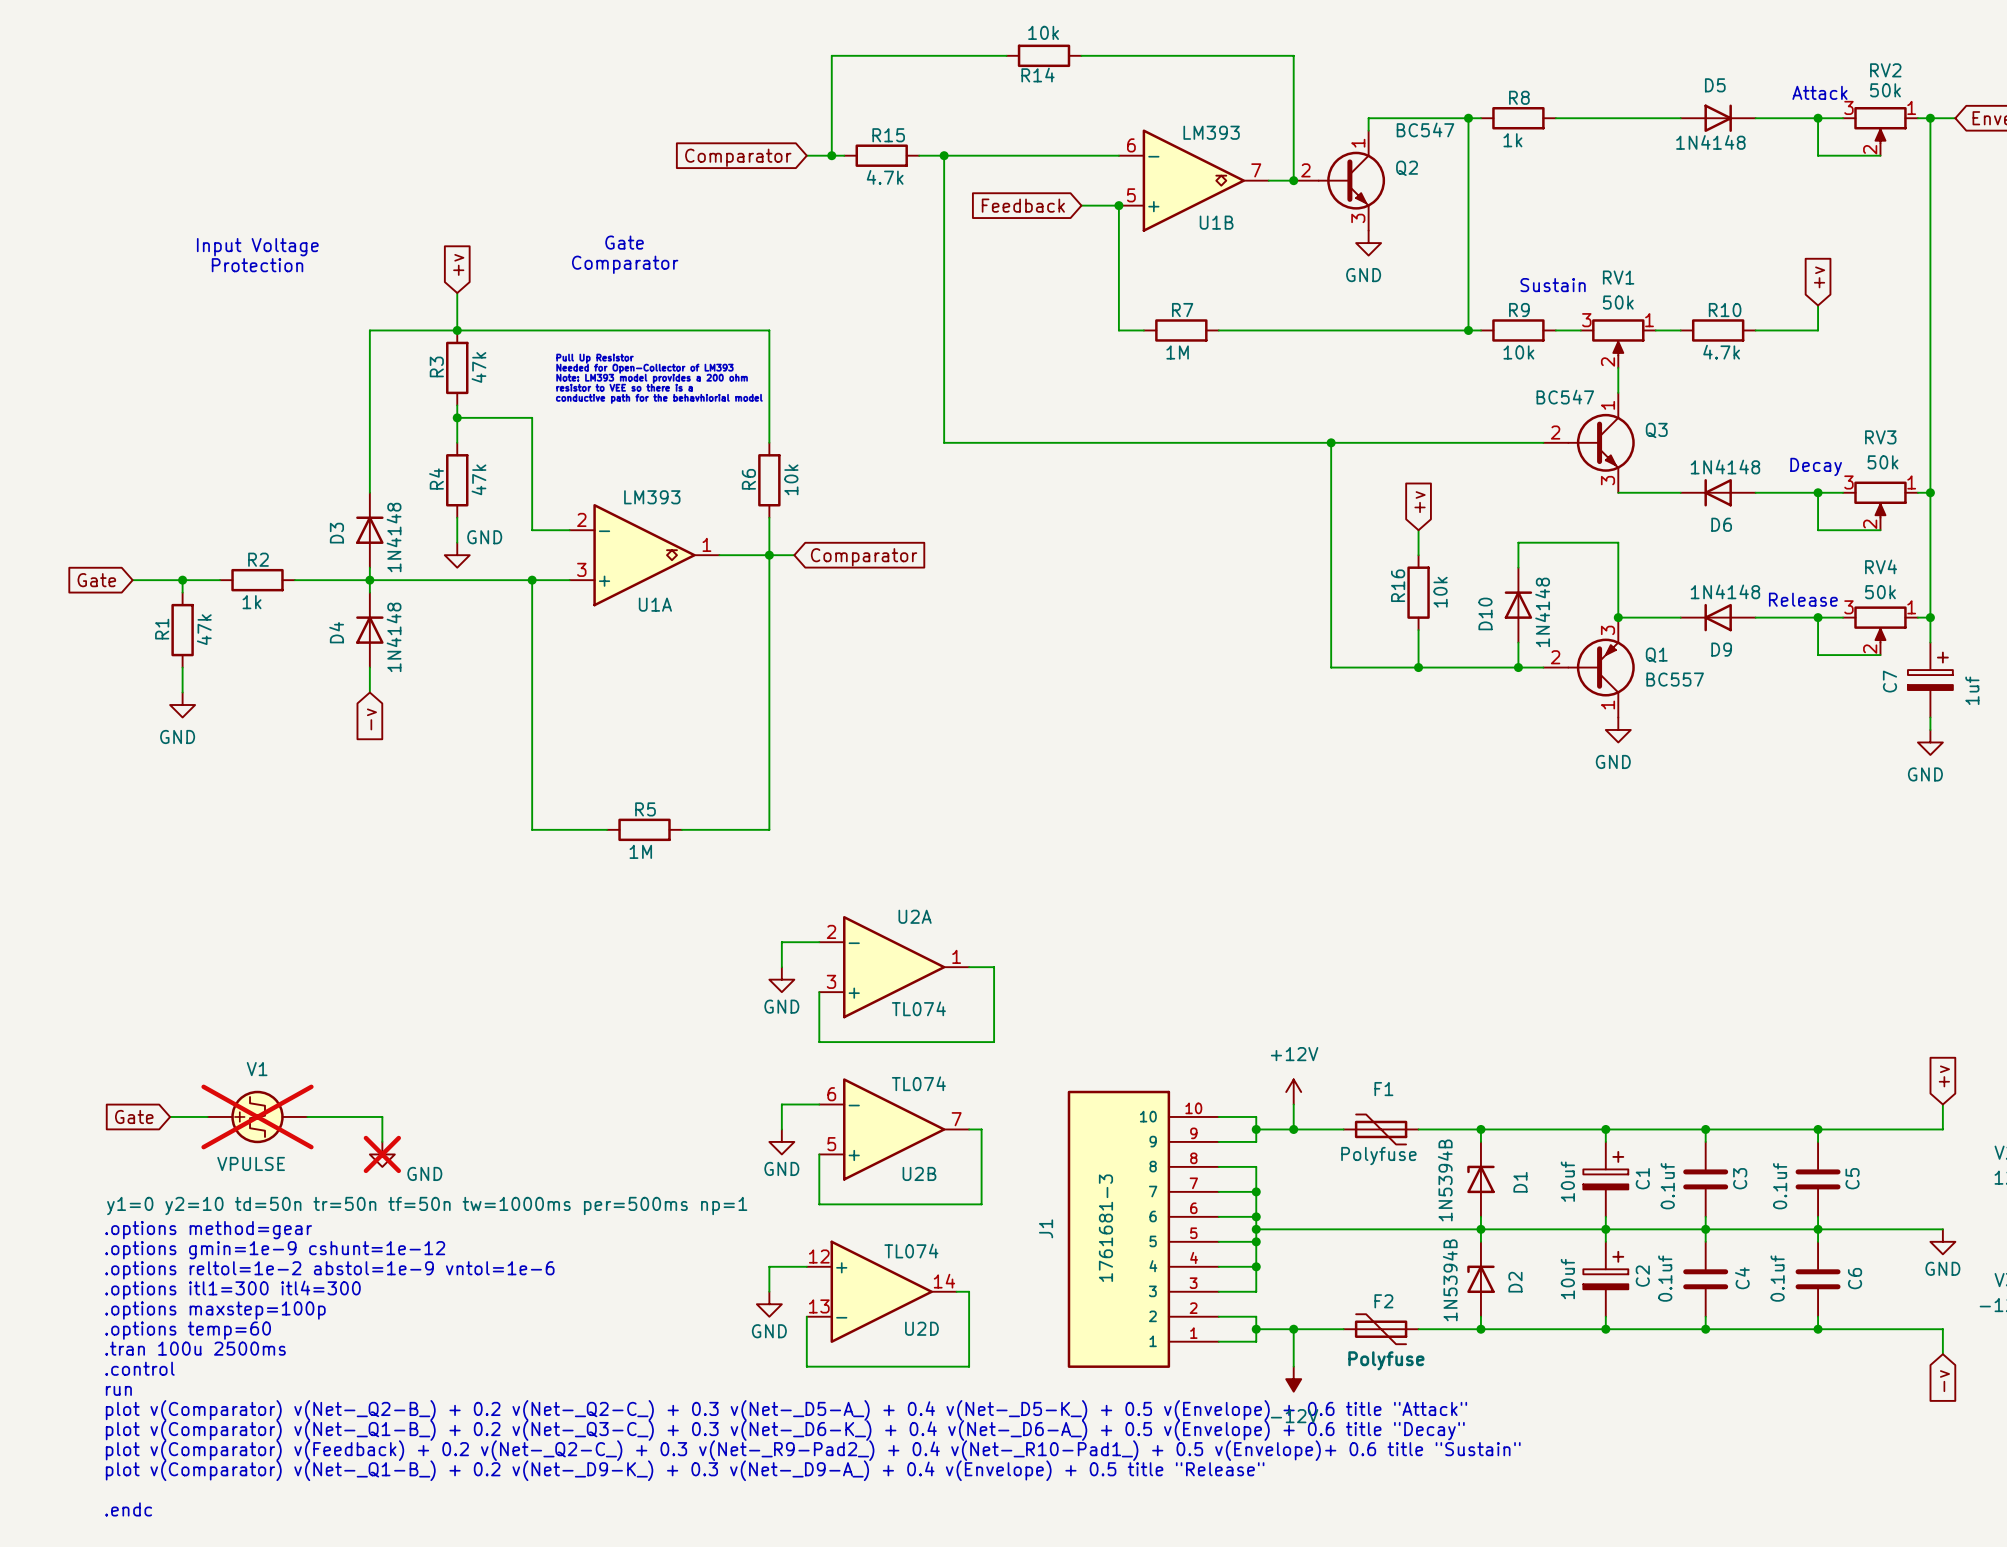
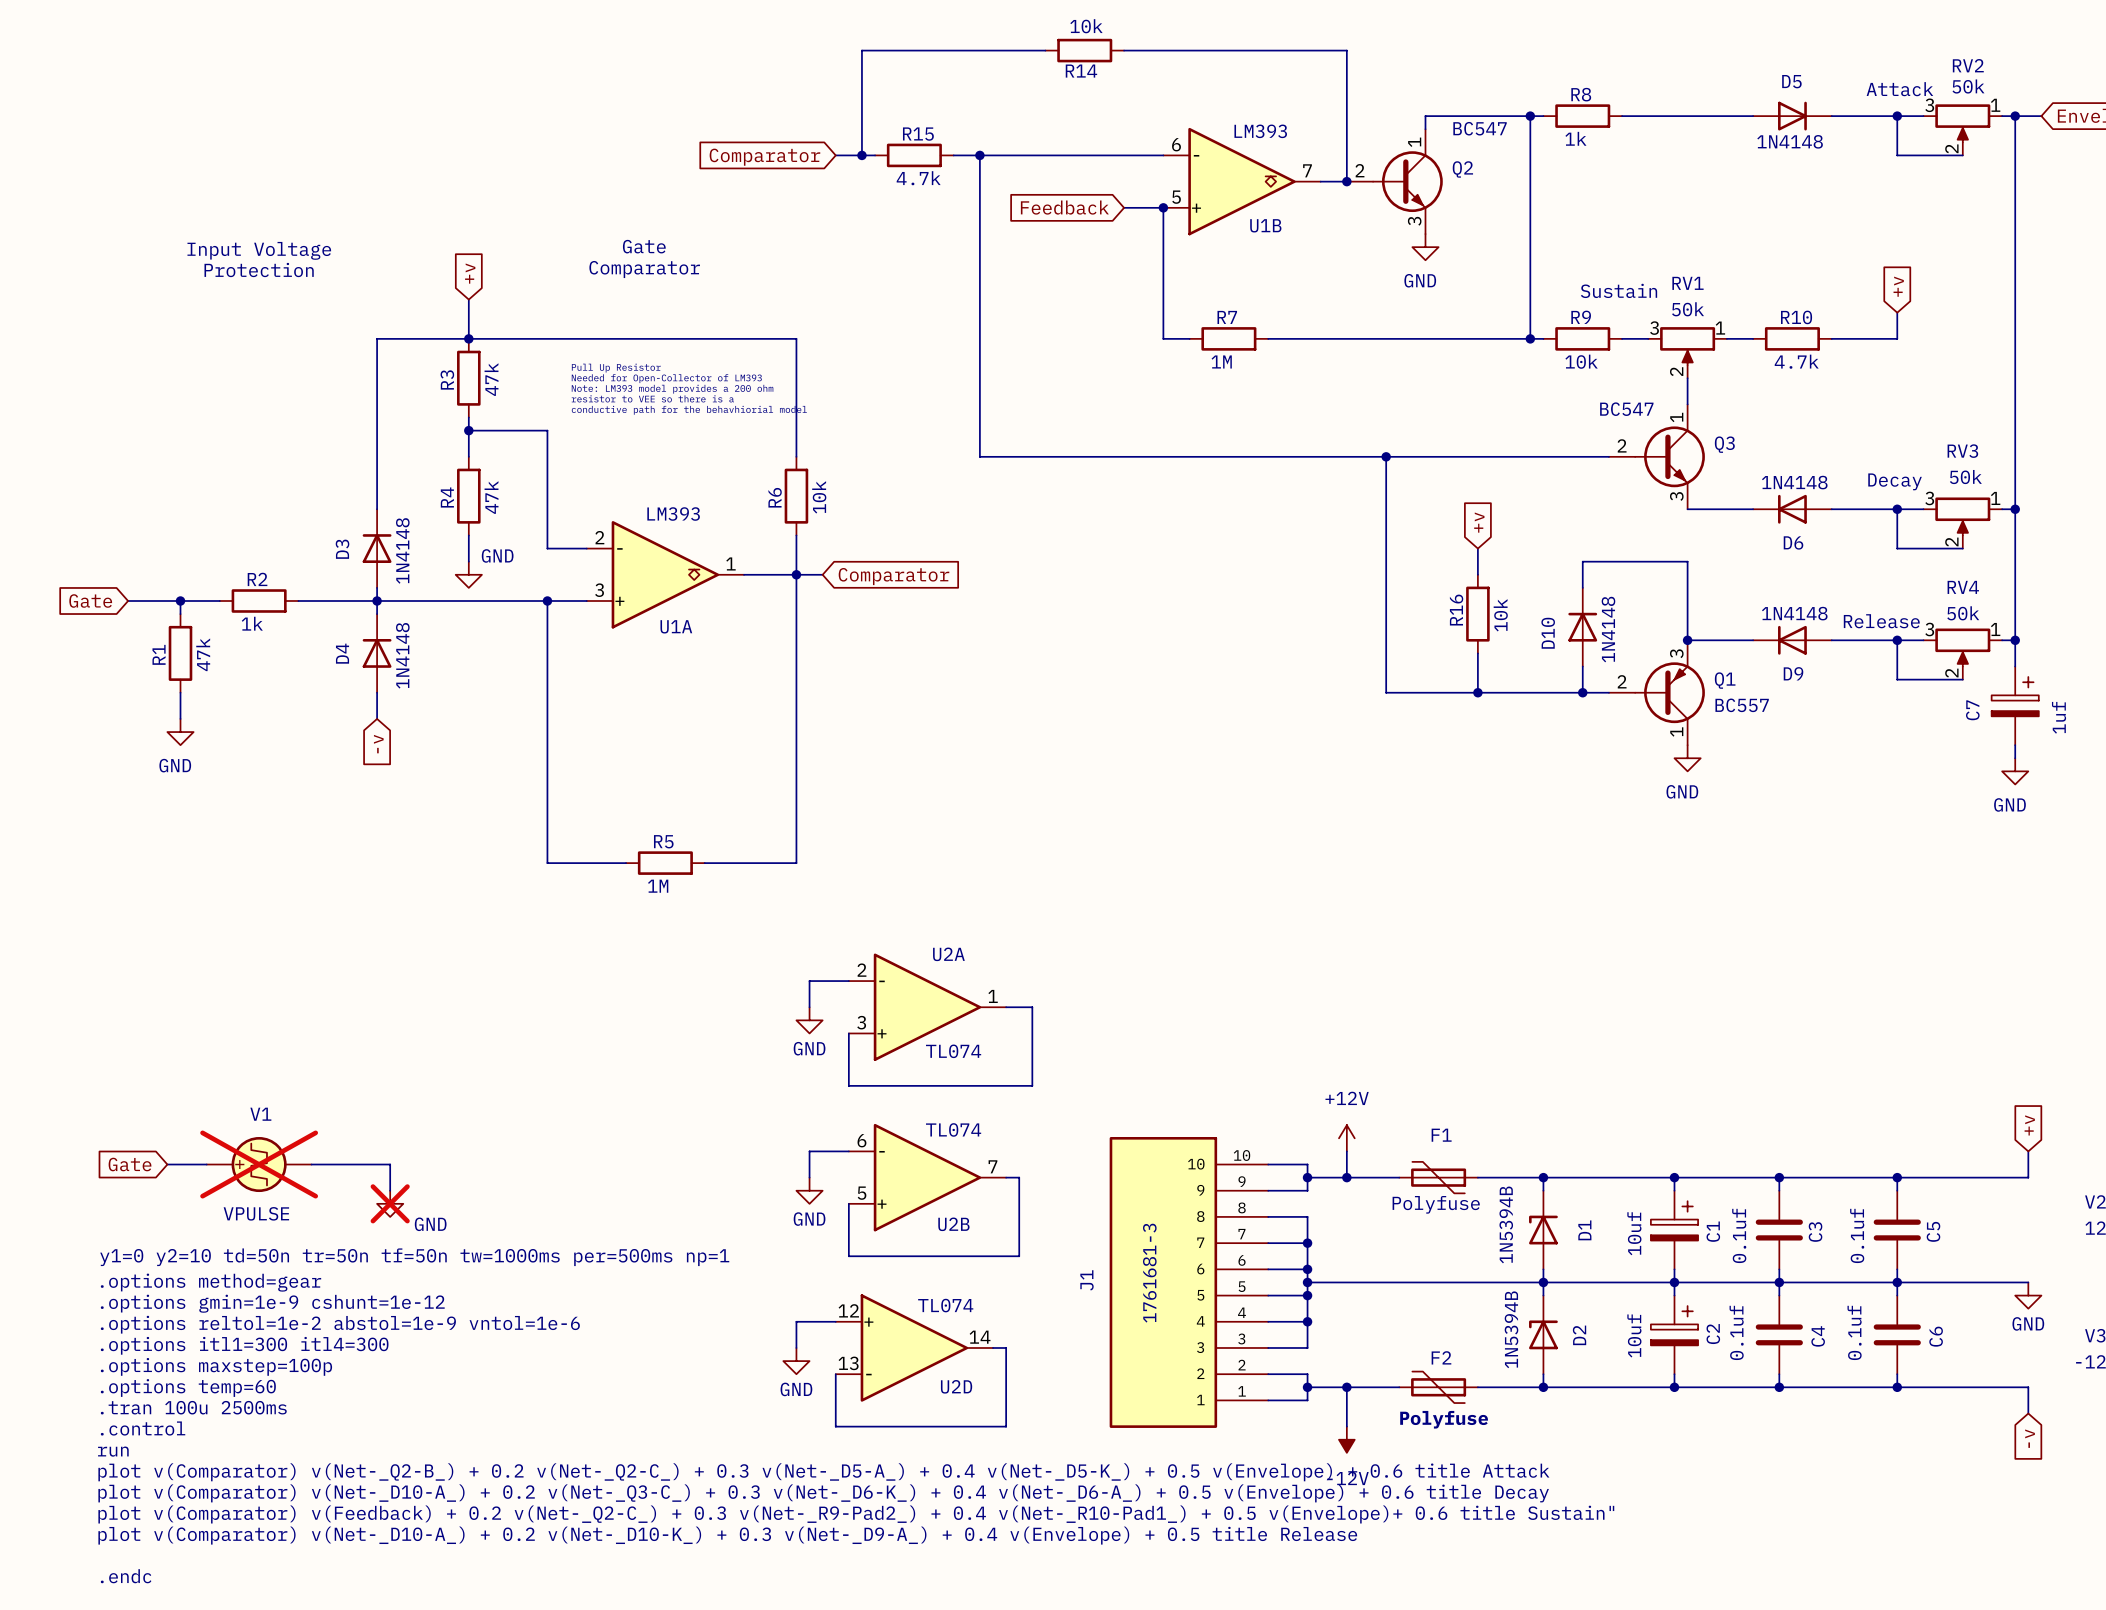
text: plot v(Comparator) v(Net-_Q2-B_) + 0.2 v(Net-_Q2-C_) + 0.3 v(Net-_D5-A_) + 0.4 v(Net-_D5-K_) + 0.5 v(Envelope) + 0.6 title "Attack" (786, 1410) -> plot v(Comparator) v(Net-_Q2-B_) + 0.2 v(Net-_Q2-C_) + 0.3 v(Net-_D5-A_) + 0.4 v(Net-_D5-K_) + 0.5 v(Envelope) + 0.6 title Attack (823, 1472)
text: plot v(Comparator) v(Net-_Q1-B_) + 0.2 v(Net-_Q3-C_) + 0.3 v(Net-_D6-K_) + 0.4 v(Net-_D6-A_) + 0.5 v(Envelope) + 0.6 title "Decay" (785, 1430) -> plot v(Comparator) v(Net-_D10-A_) + 0.2 v(Net-_Q3-C_) + 0.3 v(Net-_D6-K_) + 0.4 v(Net-_D6-A_) + 0.5 v(Envelope) + 0.6 title Decay (823, 1493)
text: plot v(Comparator) v(Feedback) + 0.2 v(Net-_Q2-C_) + 0.3 v(Net-_R9-Pad2_) + 0.4 v(Net-_R10-Pad1_) + 0.5 v(Envelope)+ 0.6 title "Sustain" (813, 1450) -> plot v(Comparator) v(Feedback) + 0.2 v(Net-_Q2-C_) + 0.3 v(Net-_R9-Pad2_) + 0.4 v(Net-_R10-Pad1_) + 0.5 v(Envelope)+ 0.6 title Sustain" (856, 1514)
text: plot v(Comparator) v(Net-_Q1-B_) + 0.2 v(Net-_D9-K_) + 0.3 v(Net-_D9-A_) + 0.4 v(Envelope) + 0.5 title "Release" (685, 1470) -> plot v(Comparator) v(Net-_D10-A_) + 0.2 v(Net-_D10-K_) + 0.3 v(Net-_D9-A_) + 0.4 v(Envelope) + 0.5 title Release (727, 1535)

